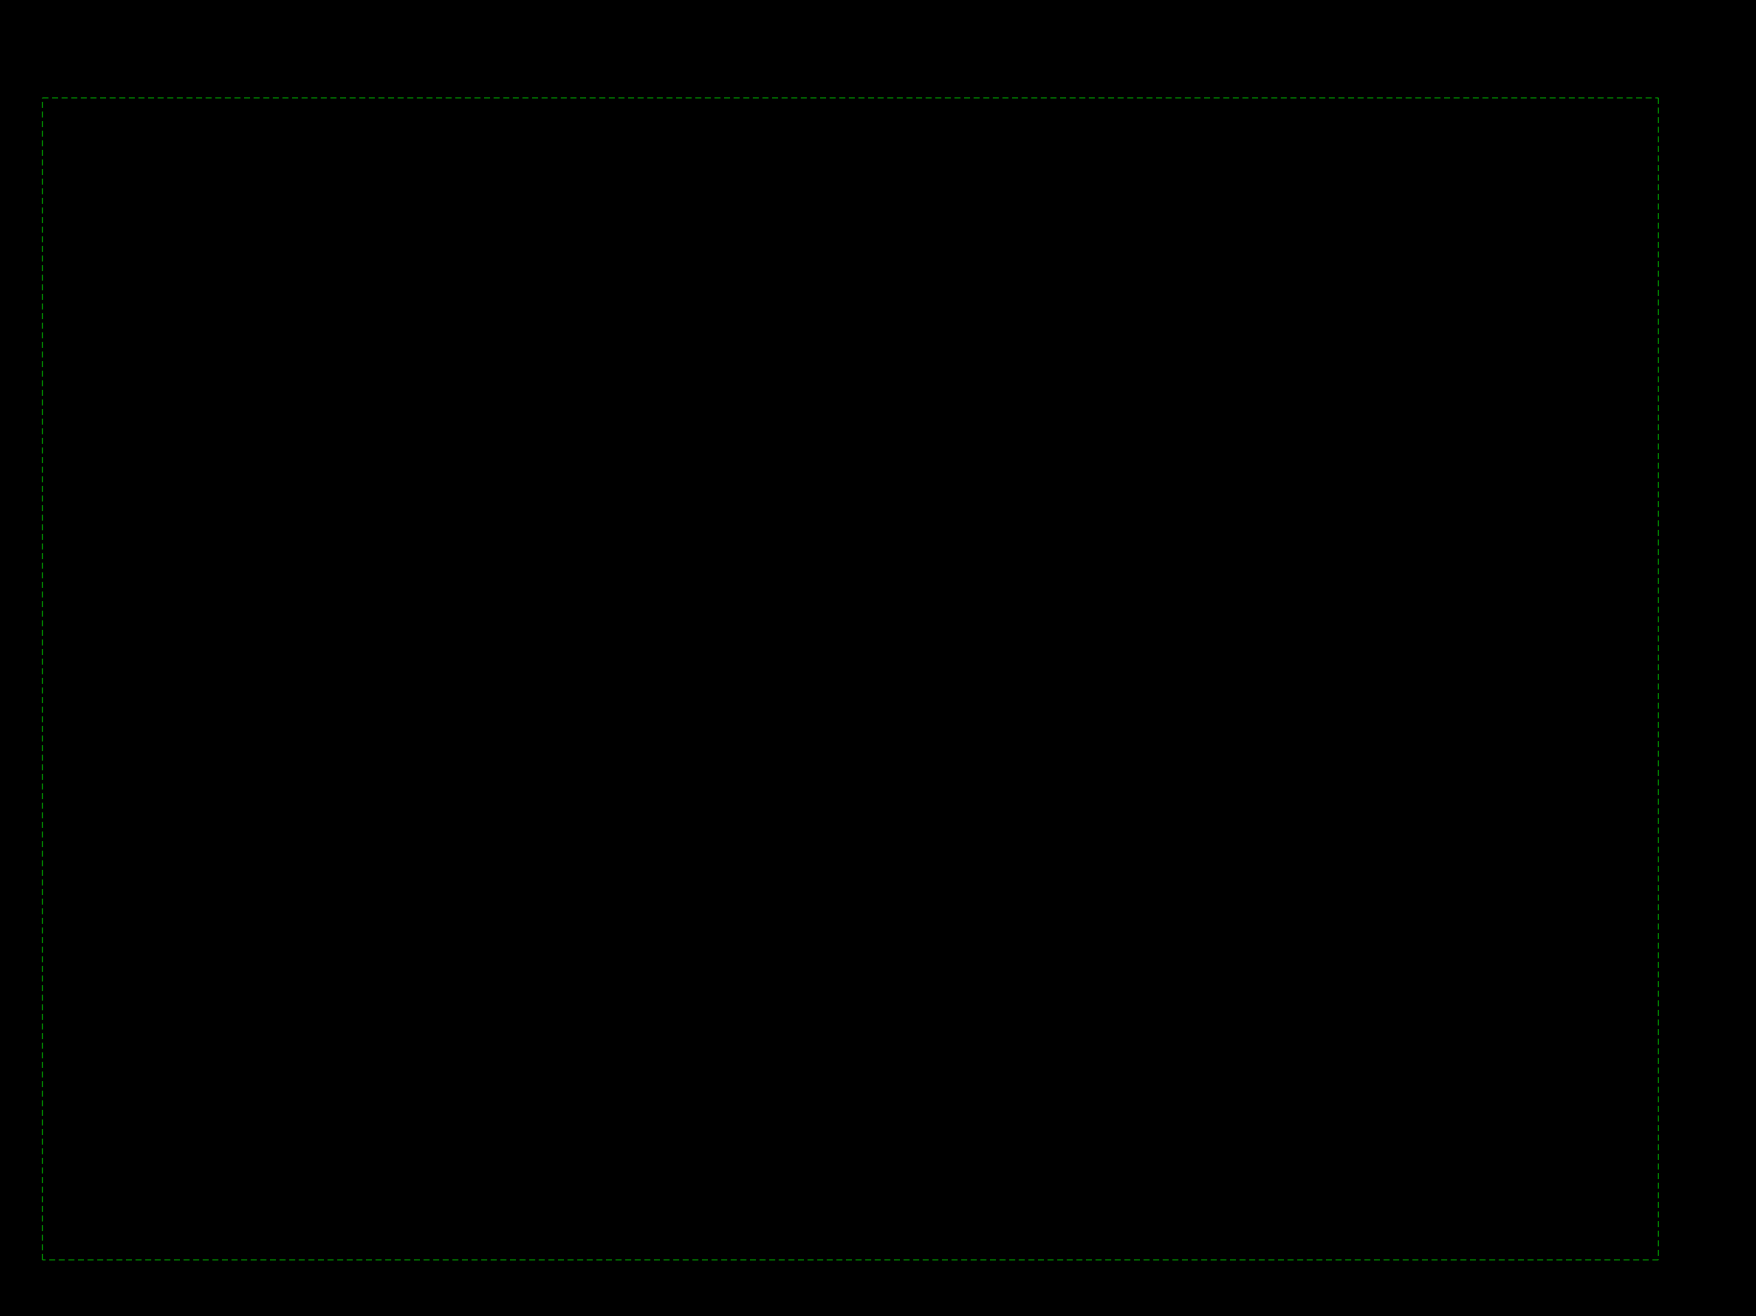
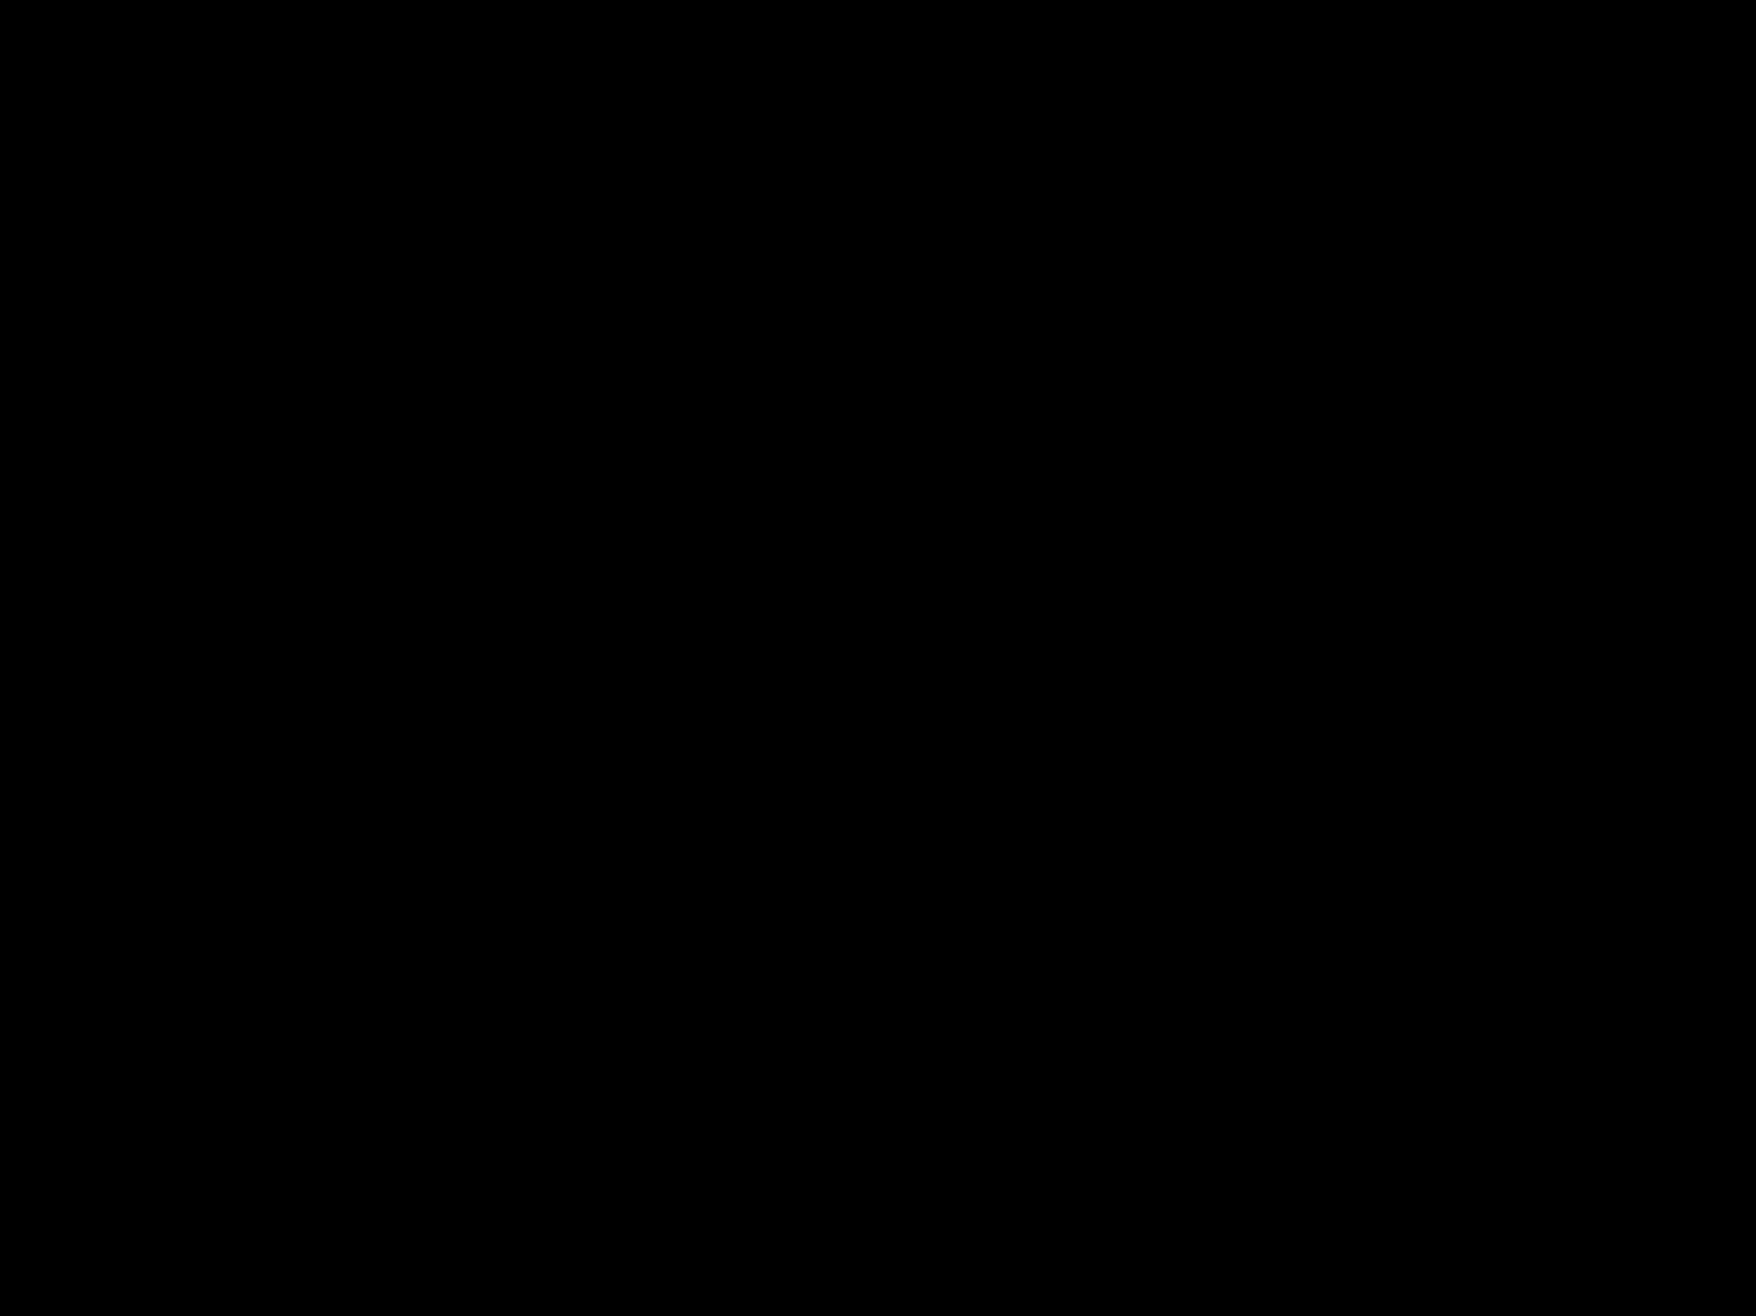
bottom zone outline: (42, 97) (1658, 97) (1658, 1259) (42, 1259) (42, 97) -> none

